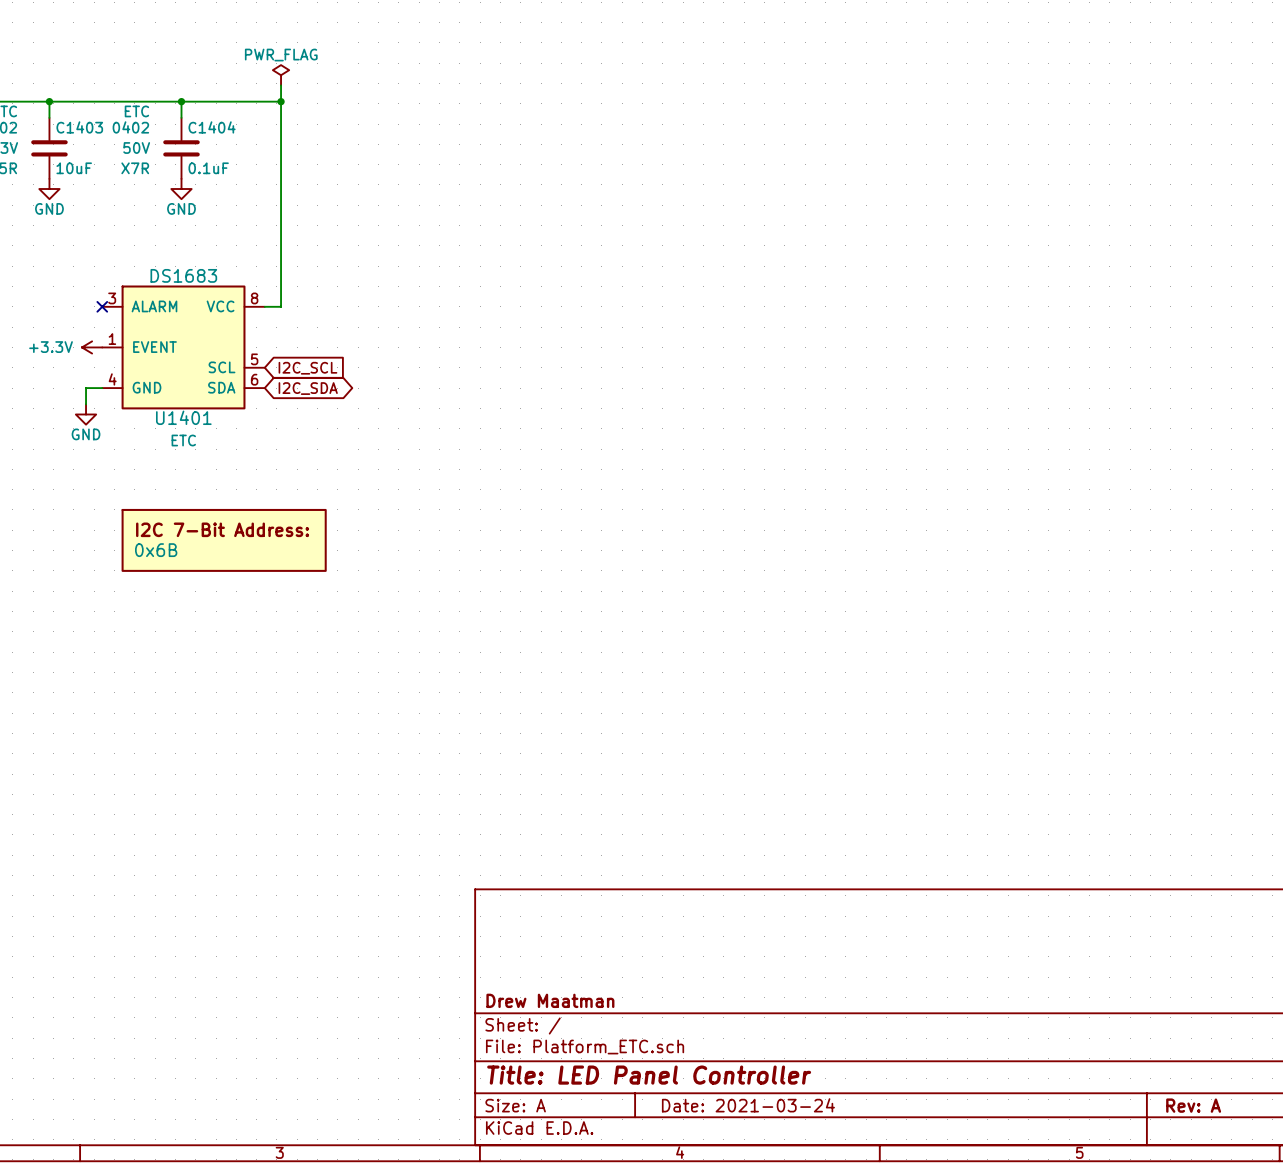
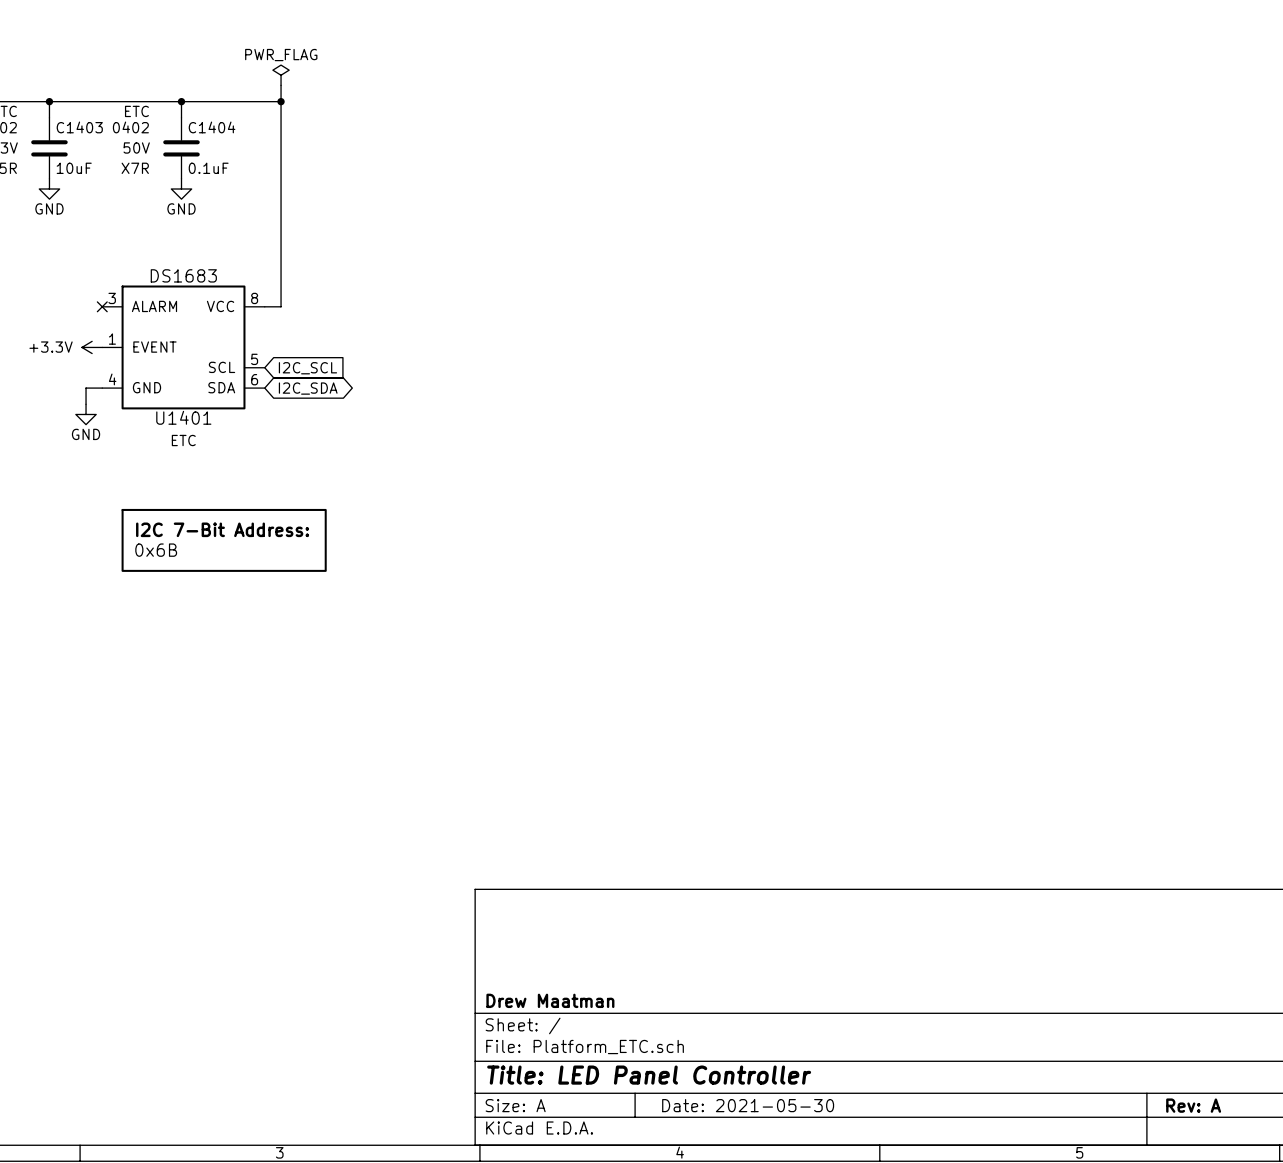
title block: Date: 2021-03-24 (748, 1105) -> Date: 2021-05-30 (748, 1105)

